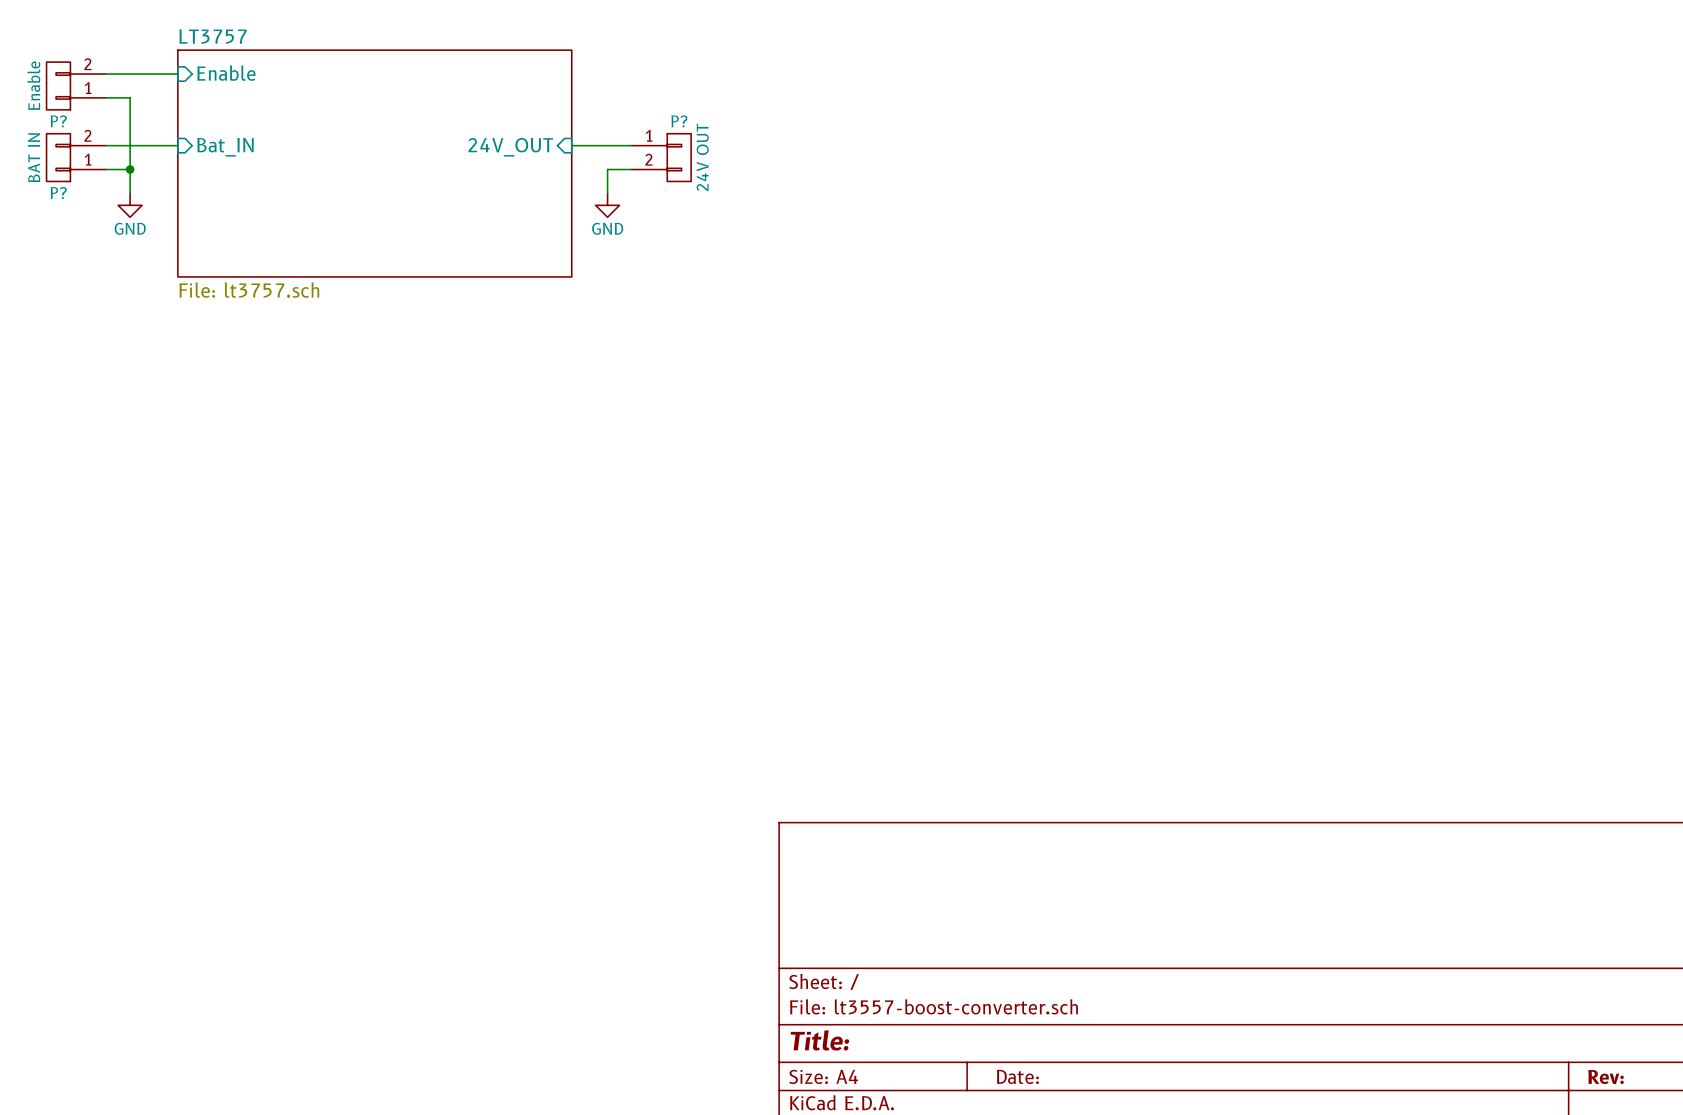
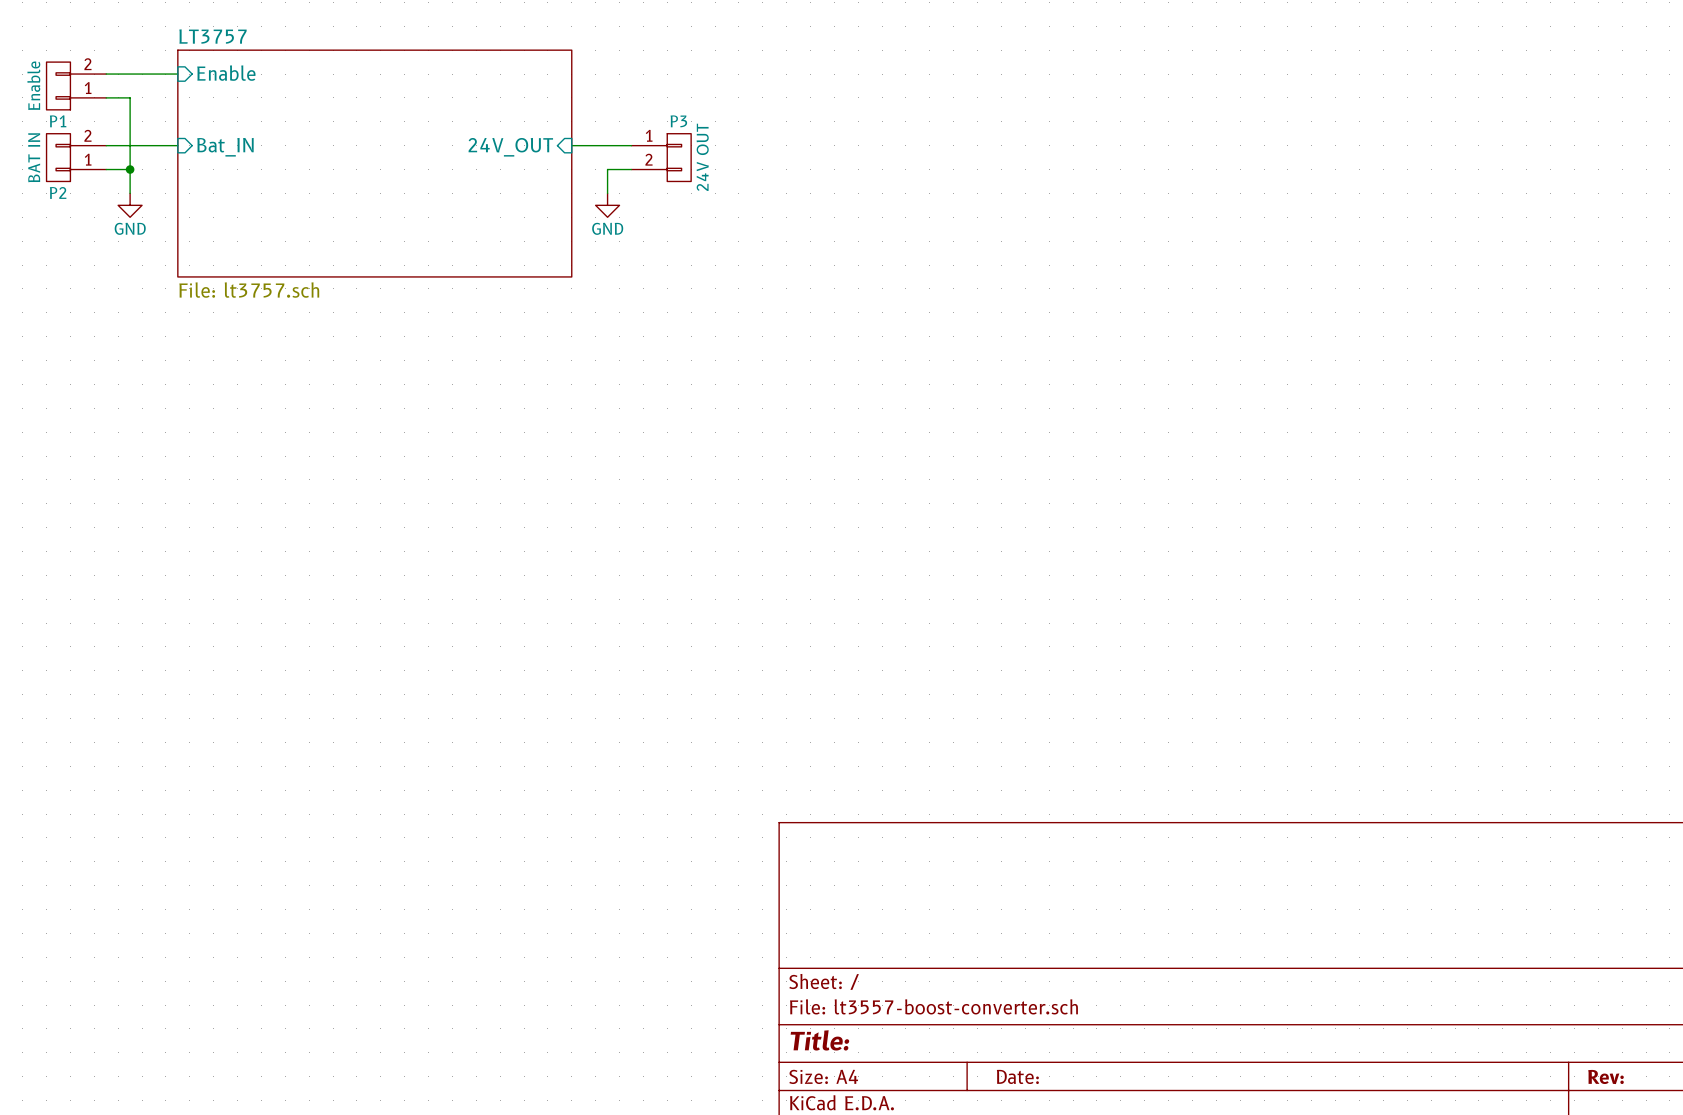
P? name: P? (58, 121) -> P1 (58, 121)
P? name: P? (679, 121) -> P3 (678, 121)
P? name: P? (58, 193) -> P2 (58, 192)

